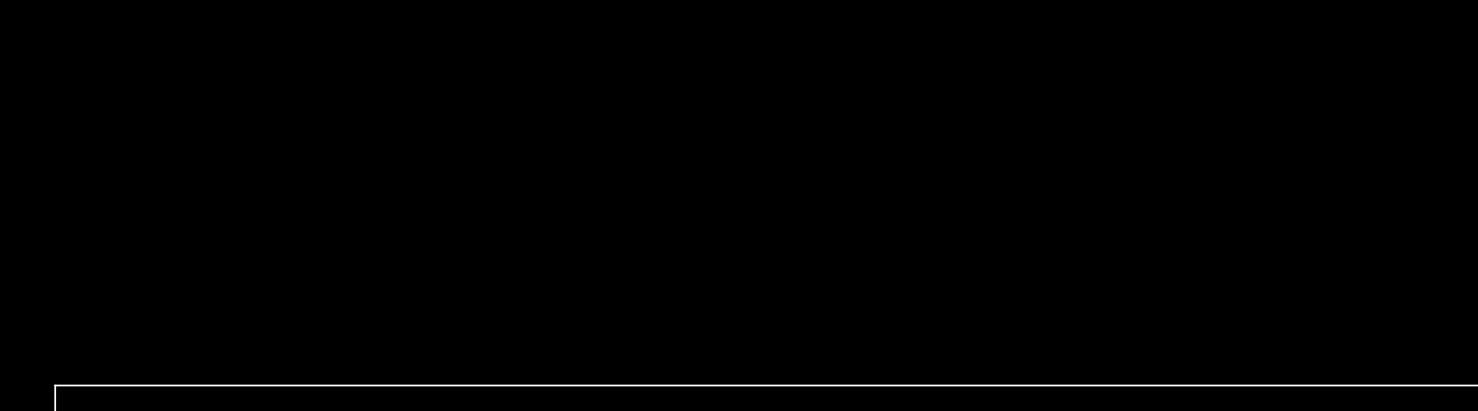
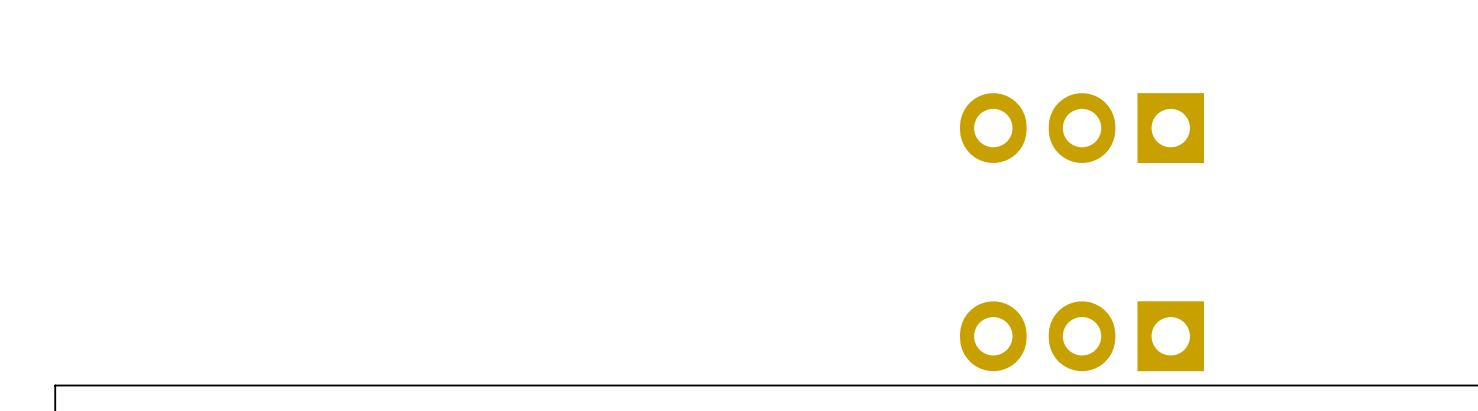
part: none -> (1082, 128)
part: none -> (1082, 336)

